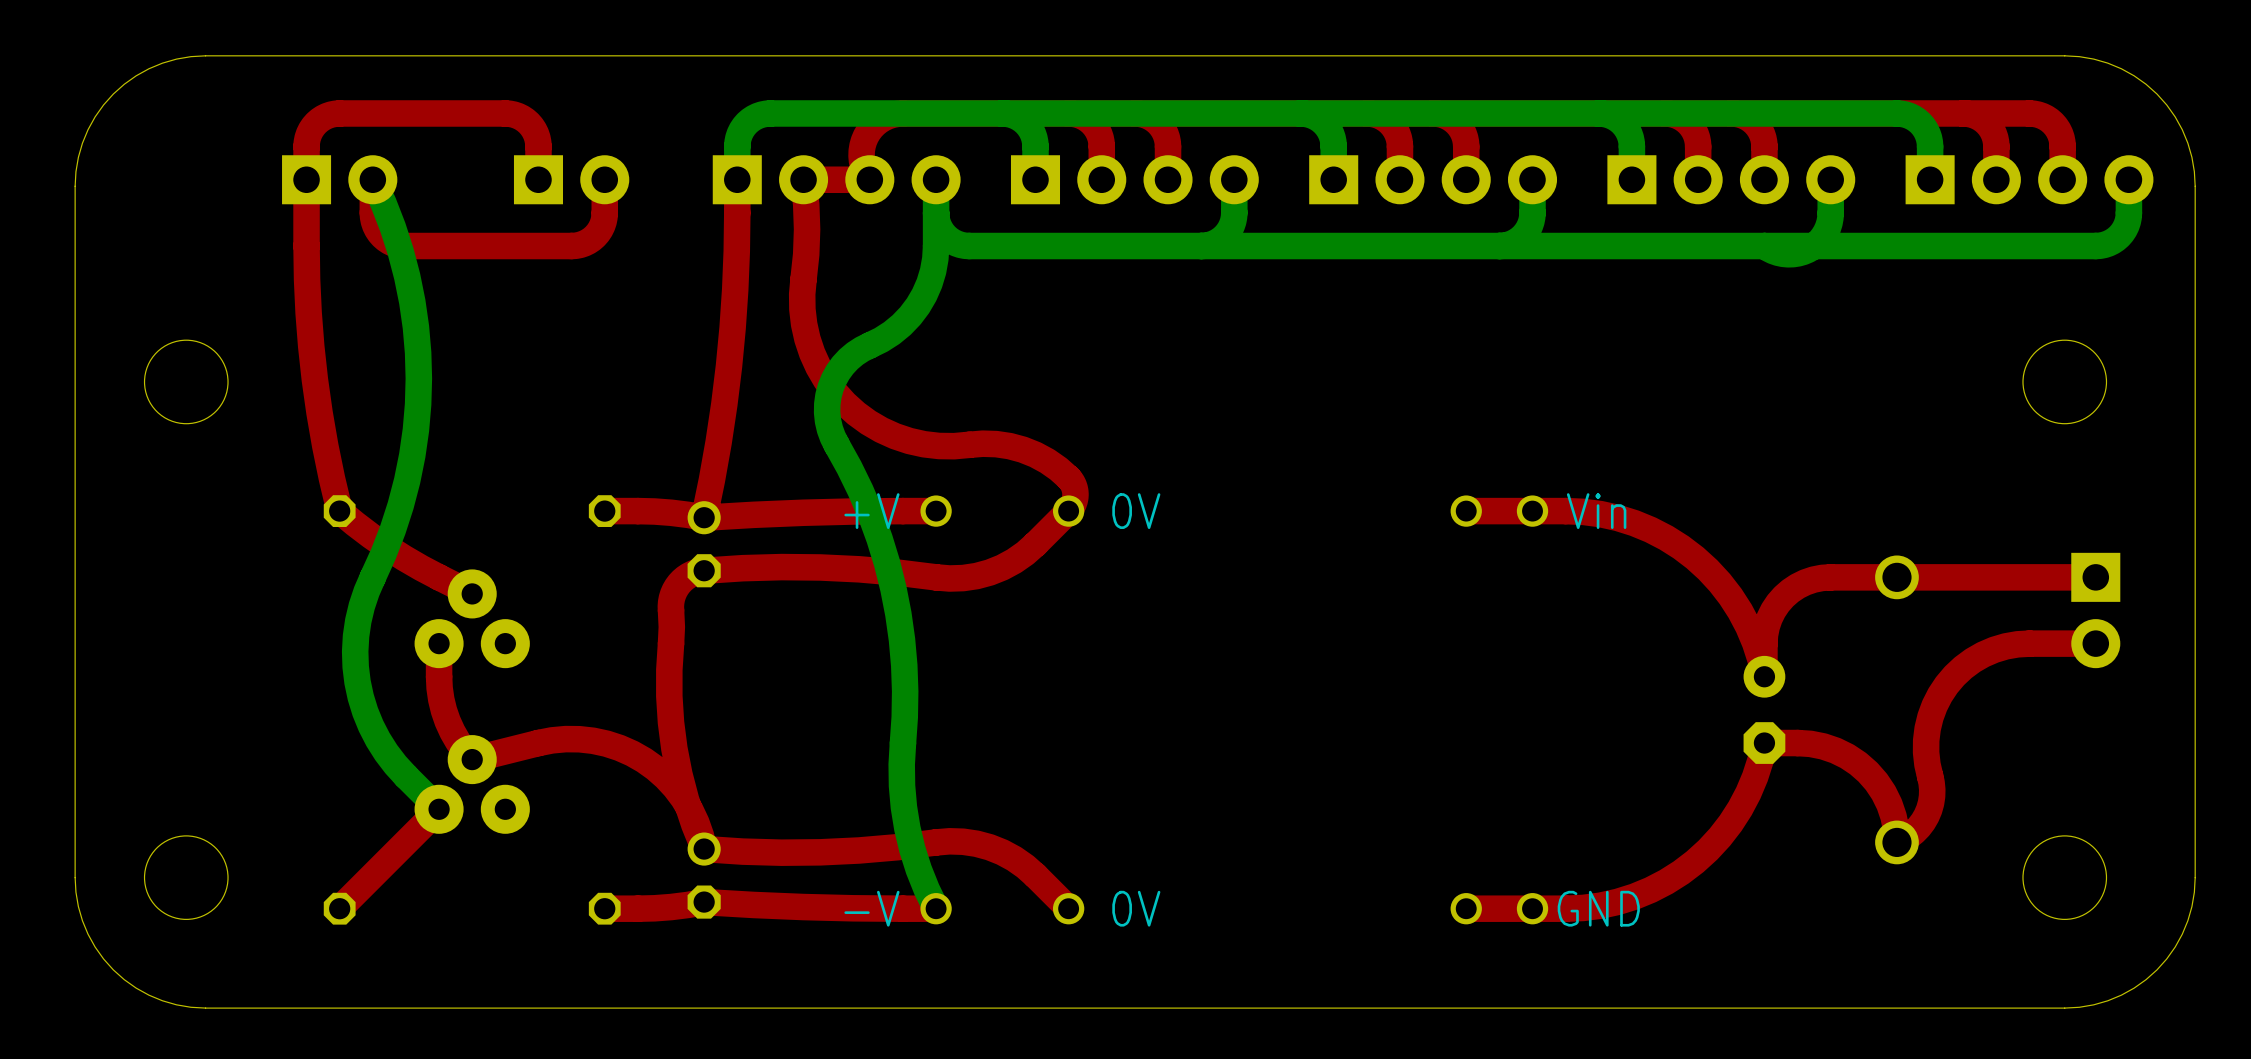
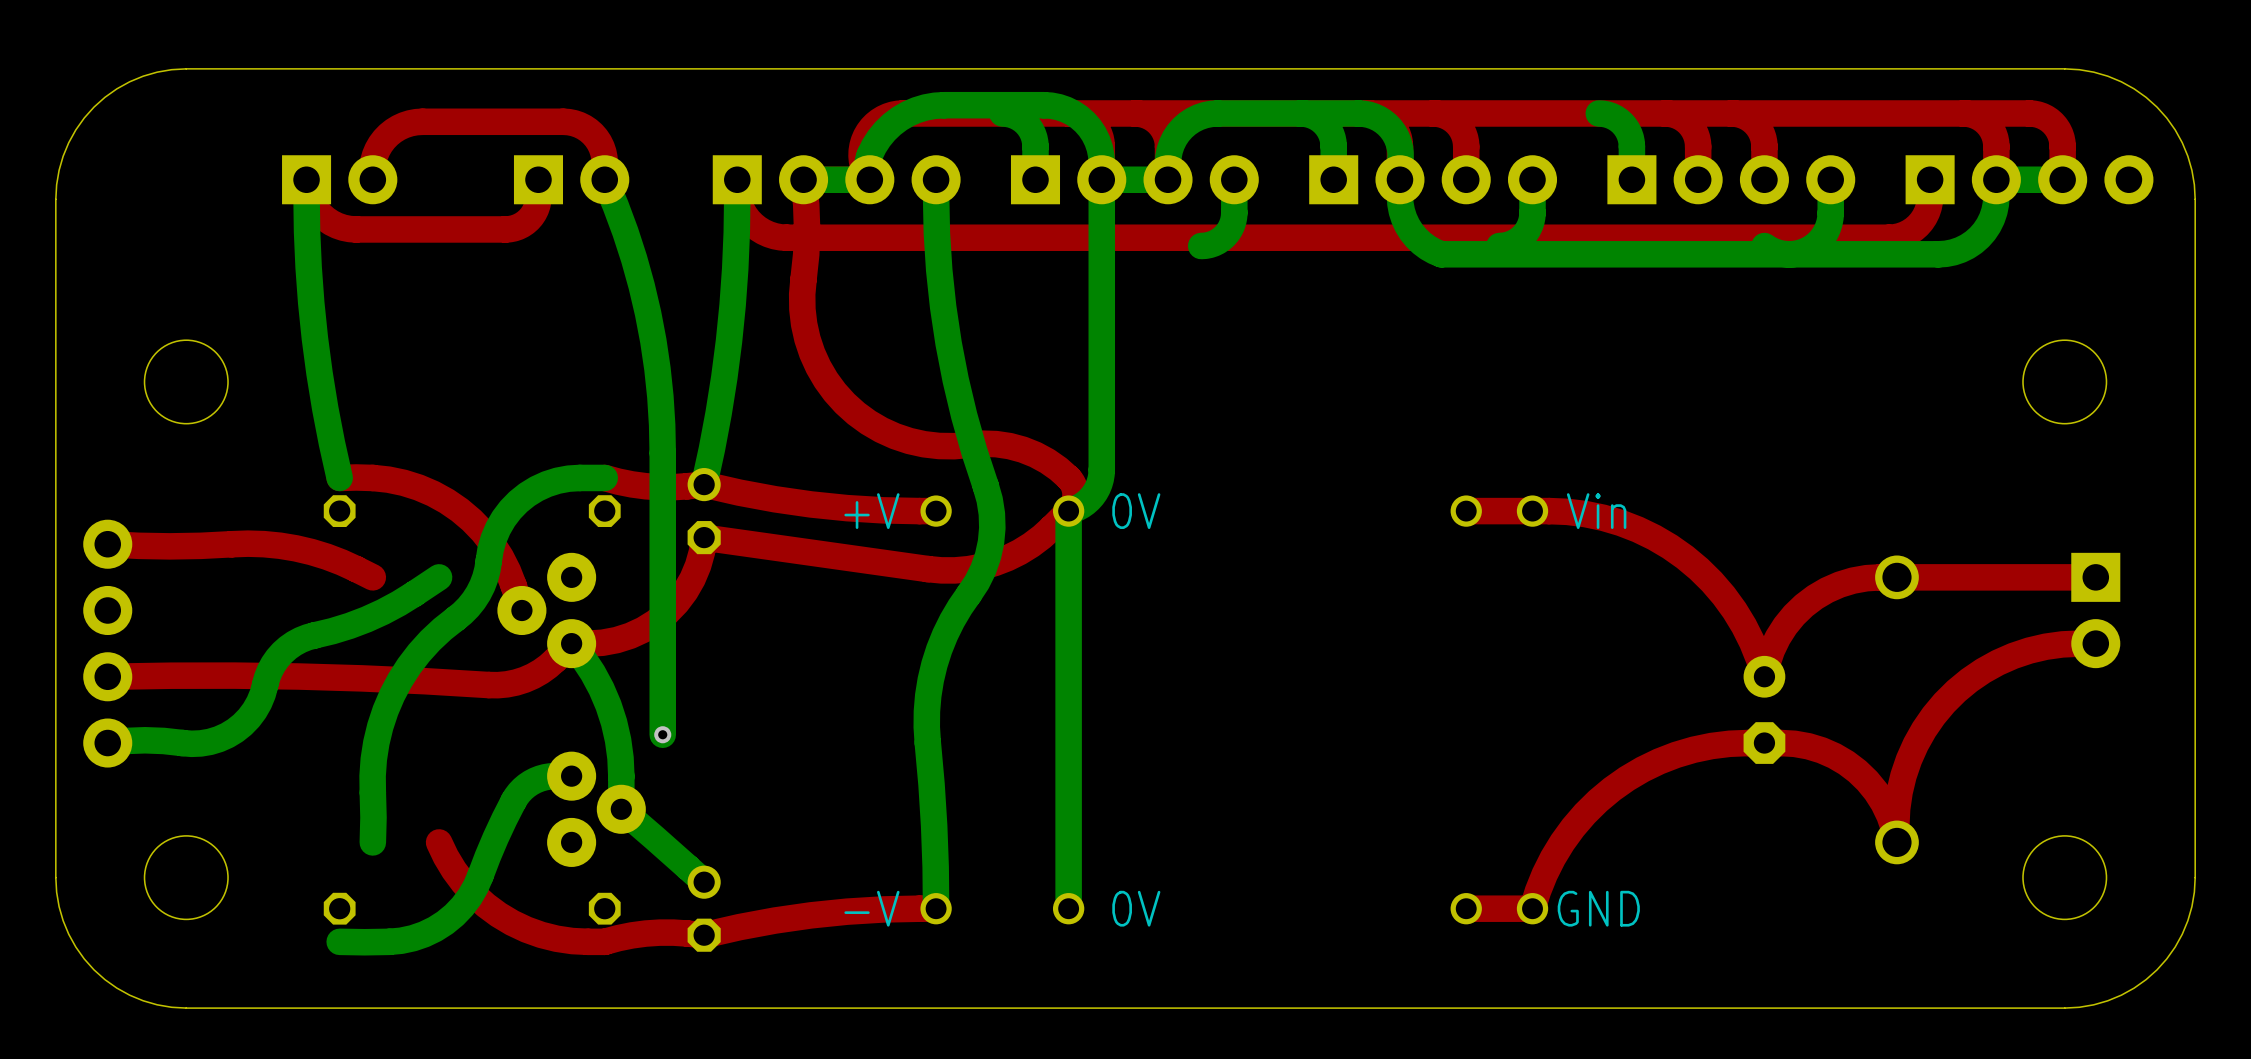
bottom track: (1217, 113) (766, 113) (750, 120) (739, 133) (737, 146) (737, 179) -> (1217, 113) (1198, 117) (1187, 123) (1178, 132) (1169, 150) (1168, 179) (1101, 179)
bottom track: (1358, 113) (1901, 113) (1917, 120) (1927, 133) (1930, 146) (1930, 179) -> (1358, 113) (1378, 118) (1394, 132) (1400, 152) (1399, 196) (1404, 218) (1416, 237) (1427, 247) (1441, 254) (1945, 253) (1967, 246) (1984, 231) (1994, 211) (1996, 179) (2062, 179)
bottom track: none -> (306, 179) (308, 267) (314, 338) (325, 408) (339, 477)
bottom track: (372, 179) (392, 227) (407, 276) (415, 327) (418, 404) (412, 455) (400, 505) (383, 553) (366, 591) (358, 620) (355, 666) (360, 697) (378, 739) (395, 764) (439, 809) -> none
top track: (538, 179) (538, 146) (535, 133) (525, 120) (509, 113) (335, 113) (327, 116) (316, 123) (309, 133) (306, 142) (307, 279) (311, 346) (325, 445) (339, 511) (370, 535) (404, 558) (472, 593) -> (538, 179) (538, 200) (534, 212) (521, 225) (505, 229) (356, 229) (343, 227) (325, 219) (316, 210) (308, 192) (306, 179)
top track: (604, 179) (604, 217) (600, 229) (588, 241) (571, 246) (397, 244) (382, 236) (375, 225) (372, 212) (372, 179) -> (604, 179) (603, 152) (596, 137) (584, 127) (563, 121) (410, 123) (393, 131) (380, 144) (373, 161) (372, 179)
bottom track: none -> (604, 179) (625, 232) (641, 285) (653, 341) (660, 396) (662, 453) (662, 734)
top track: (737, 179) (735, 289) (728, 366) (718, 442) (704, 517) -> (737, 179) (736, 192) (739, 204) (748, 220) (757, 228) (768, 234) (786, 237) (1888, 237) (1909, 232) (1921, 221) (1928, 207) (1930, 179)
bottom track: none -> (737, 179) (735, 268) (728, 341) (718, 413) (704, 484)
bottom track: none -> (803, 179) (869, 179) (867, 167) (868, 157) (873, 146) (885, 131) (907, 113) (934, 105) (1043, 105) (1058, 107) (1079, 117) (1089, 127) (1097, 140) (1101, 163) (1101, 469) (1099, 483) (1092, 496) (1081, 505) (1068, 511) (1068, 908)
bottom track: (2128, 179) (2128, 217) (2124, 229) (2112, 241) (2095, 246) (969, 246) (956, 243) (945, 236) (938, 225) (936, 212) -> none
bottom track: (936, 196) (935, 258) (924, 294) (901, 324) (881, 339) (855, 353) (842, 365) (830, 387) (827, 412) (832, 437) (870, 514) (893, 588) (904, 665) (904, 717) (901, 764) (903, 807) (912, 849) (926, 889) (936, 908) -> (936, 196) (939, 270) (948, 343) (964, 415) (989, 499) (992, 528) (991, 542) (983, 569) (945, 634) (934, 664) (928, 695) (926, 727) (934, 825) (936, 908)
board edge: (2195, 199) (2194, 171) (2187, 143) (2175, 116) (2166, 104) (2146, 84) (2134, 75) (2107, 63) (2079, 56) (205, 55) (190, 56) (162, 63) (136, 75) (124, 84) (103, 104) (95, 116) (82, 143) (75, 171) (75, 877) (75, 892) (82, 920) (95, 947) (113, 969) (136, 988) (162, 1000) (190, 1007) (205, 1008) -> (2195, 199) (2194, 184) (2187, 156) (2175, 129) (2166, 117) (2146, 97) (2134, 88) (2107, 76) (2079, 69) (186, 68) (171, 69) (143, 76) (116, 88) (104, 97) (84, 117) (75, 129) (63, 156) (56, 184) (56, 892) (63, 920) (75, 947) (84, 958) (104, 979) (129, 995) (157, 1004) (205, 1008)
top track: none -> (339, 477) (372, 477) (403, 482) (433, 493) (459, 510) (482, 531) (500, 557) (521, 610)
bottom track: none -> (604, 477) (557, 480) (536, 488) (518, 501) (498, 528) (490, 549) (485, 577) (473, 600) (462, 613) (430, 640) (399, 680) (385, 710) (376, 742) (372, 775) (372, 842)
top track: (604, 511) (654, 511) (704, 517) -> none
top track: (919, 511) (803, 512) (704, 517) -> (919, 511) (811, 504) (704, 484) (673, 487) (645, 486) (604, 477)
top track: (1549, 511) (1600, 514) (1634, 523) (1666, 537) (1695, 557) (1719, 582) (1740, 611) (1755, 642) (1764, 676) (1766, 626) (1778, 603) (1790, 591) (1805, 582) (1822, 577) (1880, 577) -> (1549, 511) (1585, 514) (1620, 522) (1654, 537) (1684, 557) (1711, 581) (1734, 610) (1752, 642) (1764, 676) (1771, 650) (1777, 637) (1794, 615) (1804, 605) (1815, 597) (1839, 584) (1866, 578) (1880, 577)
top track: (1052, 527) (1025, 553) (1014, 561) (989, 572) (963, 578) (949, 578) (859, 569) (781, 567) (704, 570) (692, 573) (682, 580) (674, 590) (671, 602) (669, 669) (670, 722) (679, 774) (686, 799) (704, 849) -> (1052, 527) (1031, 544) (1007, 558) (981, 566) (954, 570) (927, 569) (704, 537) (701, 551) (692, 578) (676, 602) (655, 622) (630, 635) (616, 640) (602, 642) (571, 643) (540, 671) (524, 679) (506, 684) (298, 676) (107, 676)
top track: none -> (107, 544) (169, 546) (248, 543) (279, 545) (326, 556) (372, 577)
part position: (704, 544) -> (704, 511)
part: none -> (107, 577)
bottom track: none -> (439, 577) (382, 611) (349, 625) (307, 637) (288, 647) (277, 658) (269, 670) (262, 694) (254, 710) (242, 724) (227, 735) (200, 743) (145, 740) (107, 743)
part rotation: 0° (472, 618) -> 90° counterclockwise (546, 610)
part position: (472, 618) -> (546, 610)
top track: (439, 643) (439, 688) (443, 710) (458, 741) (472, 759) (538, 743) (565, 739) (593, 740) (619, 747) (644, 760) (675, 787) (690, 810) (704, 849) -> none
bottom track: none -> (571, 643) (592, 672) (608, 705) (614, 722) (620, 758) (621, 809) (704, 882)
top track: (2079, 643) (2029, 643) (2005, 646) (1972, 660) (1954, 675) (1934, 705) (1927, 728) (1926, 752) (1932, 789) (1929, 809) (1919, 827) (1908, 836) (1896, 842) (1893, 816) (1889, 804) (1876, 781) (1858, 763) (1847, 756) (1823, 746) (1810, 743) (1781, 743) -> (2079, 643) (2045, 646) (2013, 655) (1983, 670) (1969, 680) (1944, 702) (1924, 729) (1915, 744) (1903, 775) (1897, 808) (1896, 842) (1889, 815) (1883, 803) (1876, 791) (1857, 771) (1846, 762) (1821, 750) (1794, 743) (1781, 743)
part: none -> (107, 709)
via: none -> (662, 734)
top track: (1764, 743) (1755, 776) (1740, 808) (1719, 837) (1695, 861) (1681, 872) (1650, 889) (1617, 901) (1583, 907) (1532, 908) -> (1764, 743) (1711, 746) (1676, 754) (1642, 769) (1612, 789) (1585, 813) (1562, 842) (1544, 874) (1532, 908)
bottom track: none -> (571, 776) (540, 778) (530, 782) (519, 792) (495, 837) (475, 886) (462, 906) (445, 922) (424, 934) (401, 940) (339, 941)
part: (472, 784) -> none
top track: (439, 809) (339, 908) -> none
part: none -> (596, 809)
top track: (704, 849) (820, 852) (949, 841) (976, 843) (1002, 852) (1025, 866) (1068, 908) -> none
part position: (704, 875) -> (704, 908)
top track: (919, 908) (803, 907) (704, 902) (654, 908) (604, 908) -> (919, 908) (811, 915) (704, 935) (659, 932) (631, 935) (604, 941) (572, 941) (541, 934) (526, 929) (512, 922) (485, 905) (474, 894) (454, 870) (439, 842)

